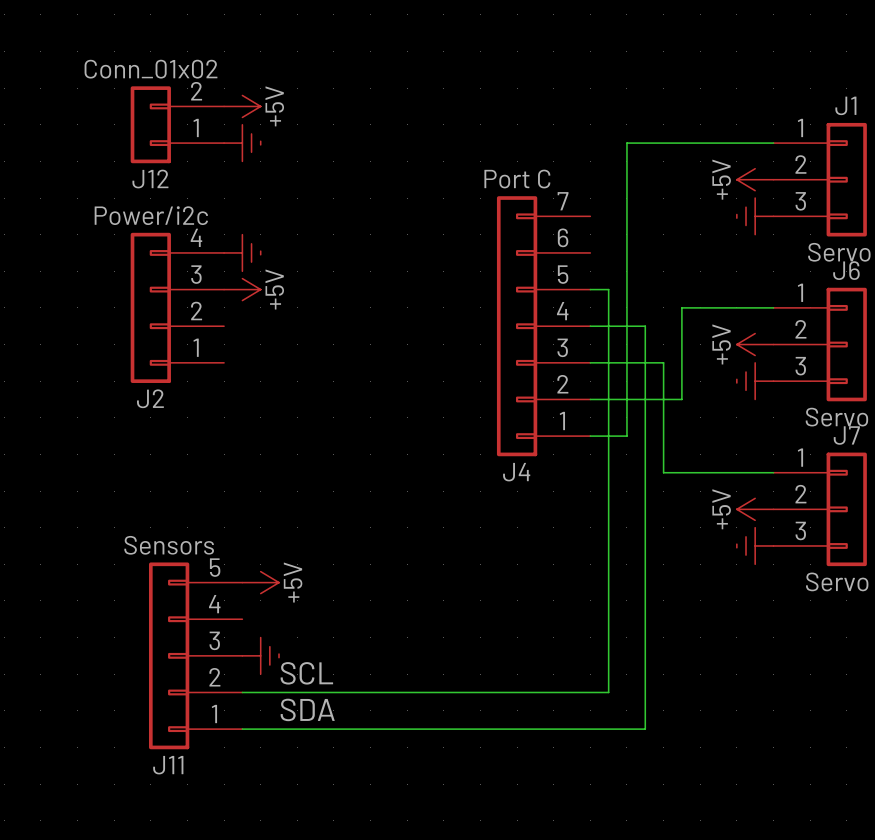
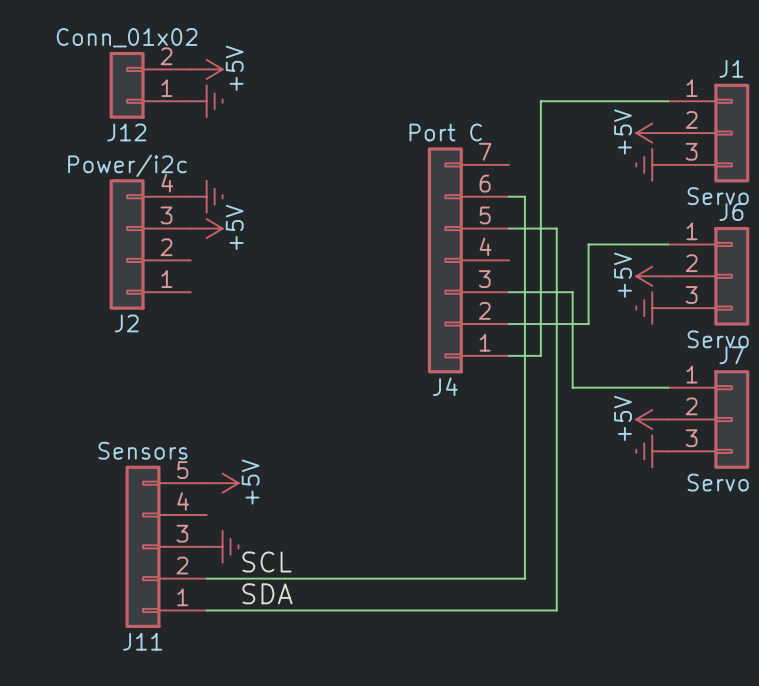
wire: (590, 326) (645, 326) -> (509, 196) (524, 196) (524, 228) (556, 228) (556, 260)

